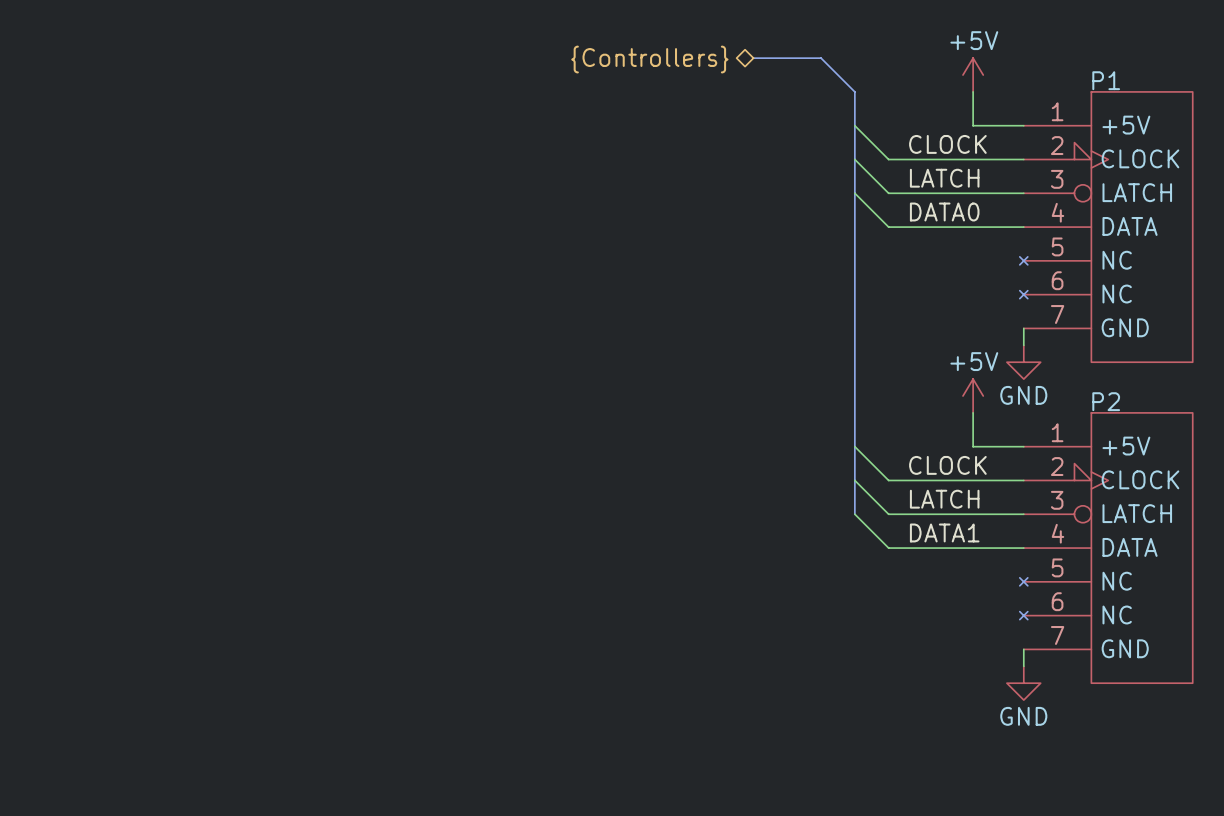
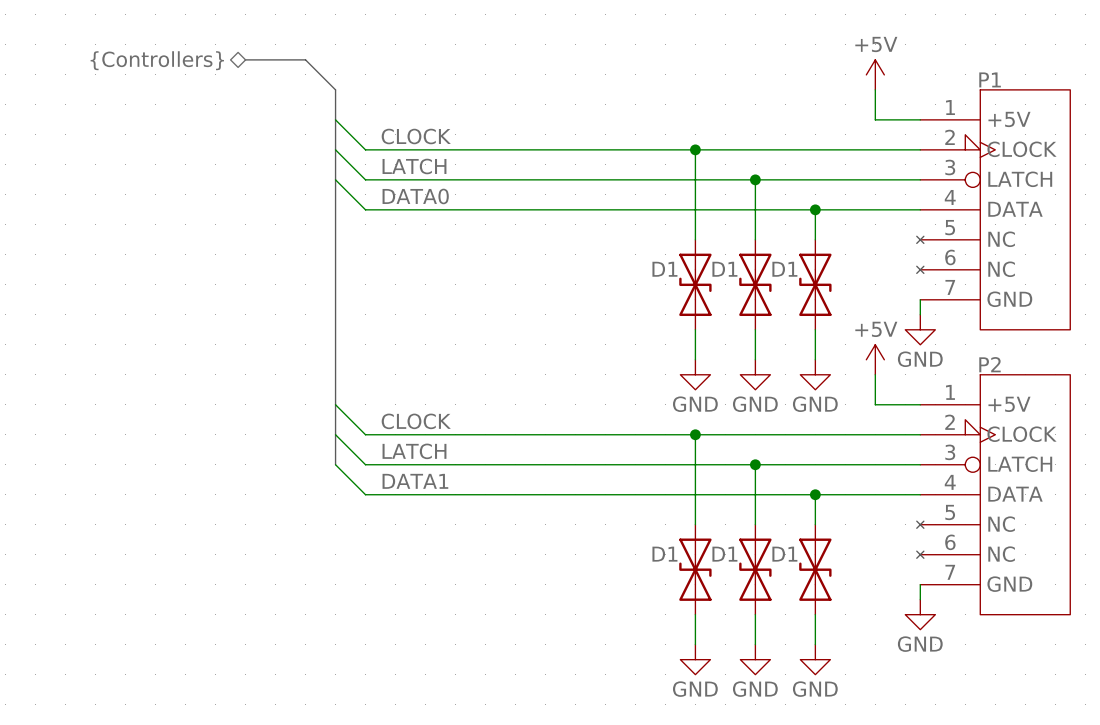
bus: none -> (245, 59) (305, 59) (335, 89) (335, 464)
bus: (753, 58) (821, 58) (854, 91) (854, 514) -> none
hierarchical label: none -> {Controllers} (157, 60)
hierarchical label: {Controllers} (649, 59) -> none
wire: (854, 125) (888, 159) -> (335, 119) (365, 149) (800, 149)
label: none -> CLOCK (416, 136)
label: CLOCK (947, 144) -> none
wire: none -> (695, 149) (695, 239)
junction: none -> (695, 149)
wire: (854, 159) (888, 193) -> (335, 149) (365, 179) (800, 179)
label: none -> LATCH (414, 166)
label: LATCH (944, 178) -> none
wire: none -> (755, 179) (755, 239)
junction: none -> (755, 179)
wire: (854, 193) (888, 227) -> (335, 179) (365, 209) (800, 209)
label: none -> DATA0 (415, 196)
label: DATA0 (944, 212) -> none
wire: none -> (815, 209) (815, 239)
junction: none -> (815, 209)
D1: none -> (695, 284)
D1: none -> (755, 284)
D1: none -> (815, 284)
wire: none -> (695, 329) (695, 359)
wire: none -> (755, 329) (755, 359)
wire: none -> (815, 329) (815, 359)
power symbol: none -> GND (695, 374)
power symbol: none -> GND (755, 374)
power symbol: none -> GND (815, 374)
wire: (854, 446) (888, 480) -> (335, 404) (365, 434) (800, 434)
label: none -> CLOCK (416, 421)
label: CLOCK (947, 465) -> none
wire: none -> (695, 434) (695, 524)
junction: none -> (695, 434)
wire: (854, 480) (888, 514) -> (335, 434) (365, 464) (800, 464)
label: none -> LATCH (414, 451)
label: LATCH (944, 499) -> none
wire: none -> (755, 464) (755, 524)
junction: none -> (755, 464)
wire: (854, 514) (888, 548) -> (335, 464) (365, 494) (800, 494)
label: none -> DATA1 (415, 481)
label: DATA1 (944, 532) -> none
wire: none -> (815, 494) (815, 524)
junction: none -> (815, 494)
D1: none -> (695, 569)
D1: none -> (755, 569)
D1: none -> (815, 569)
wire: none -> (695, 614) (695, 644)
wire: none -> (755, 614) (755, 644)
wire: none -> (815, 614) (815, 644)
power symbol: none -> GND (695, 659)
power symbol: none -> GND (755, 659)
power symbol: none -> GND (815, 659)

